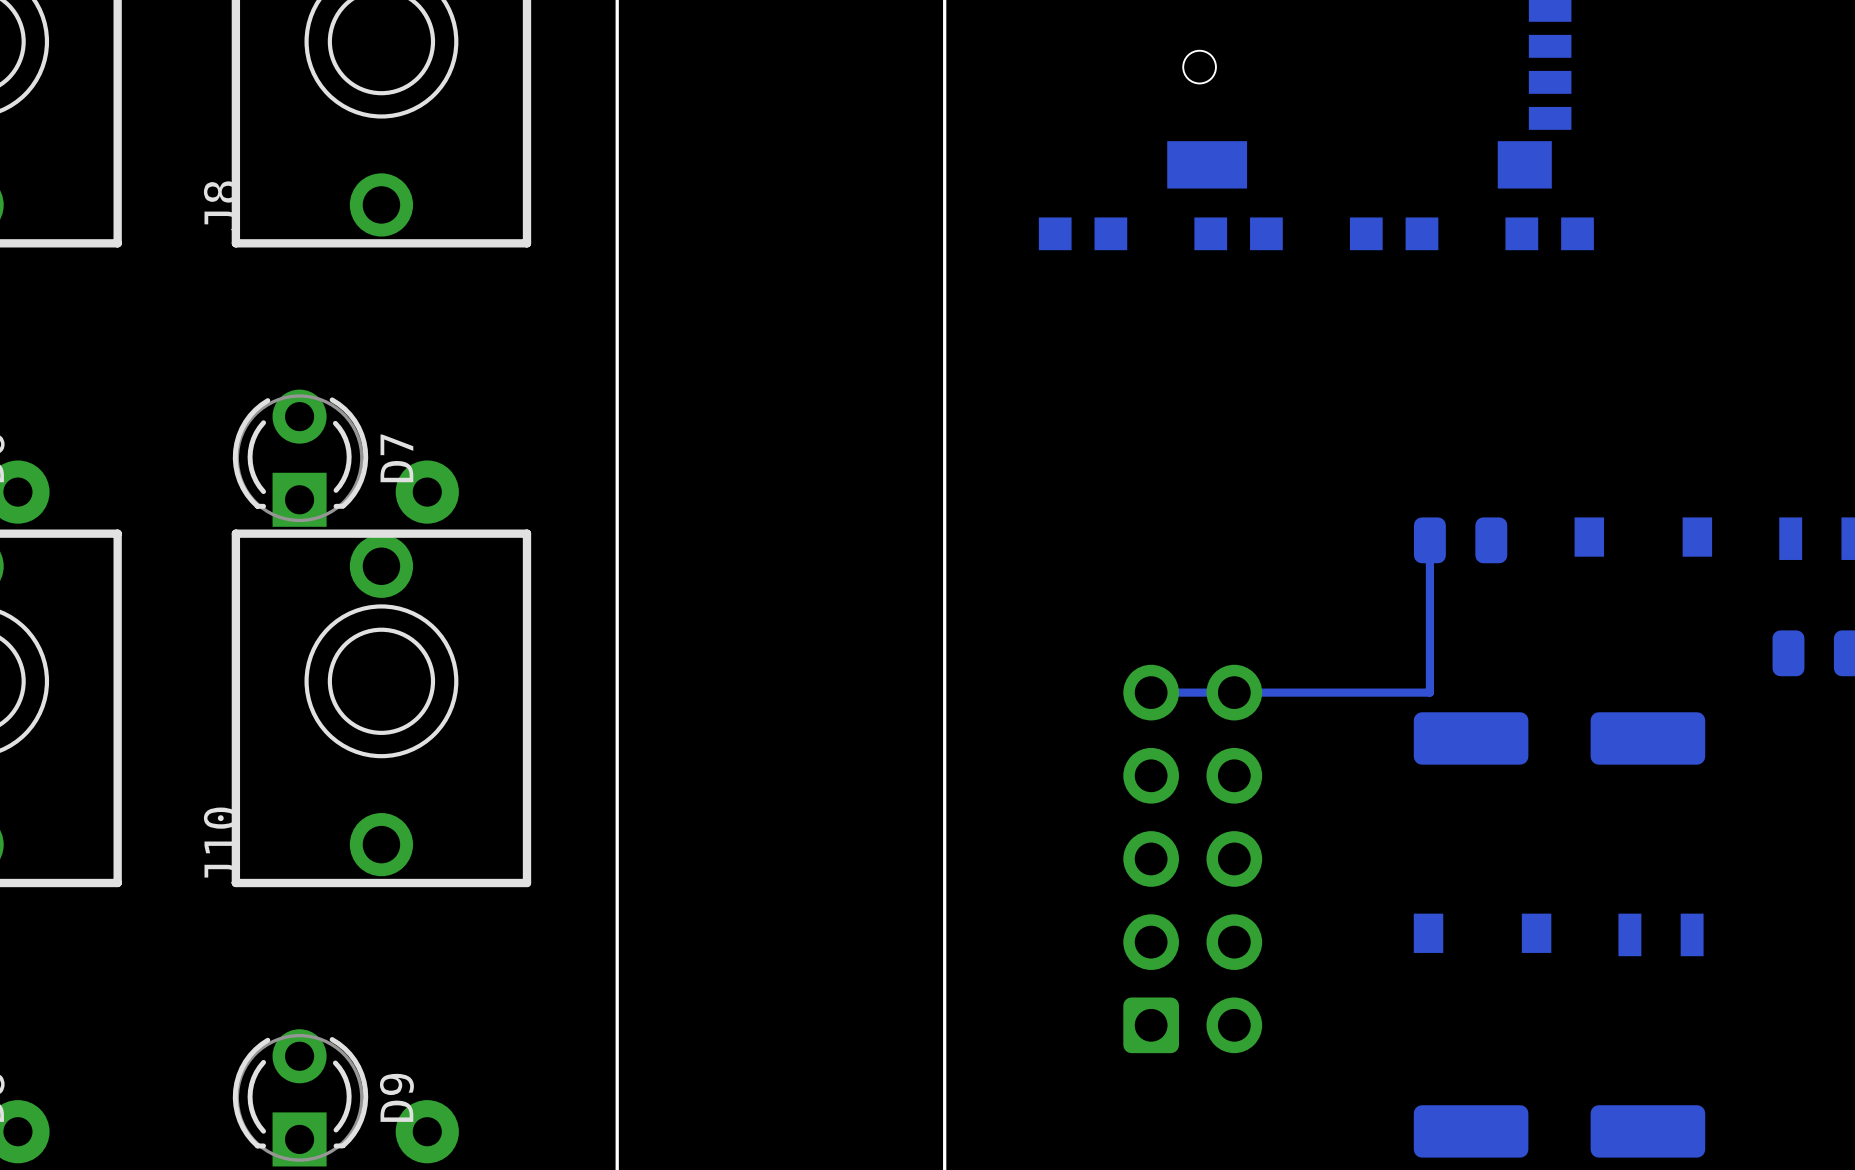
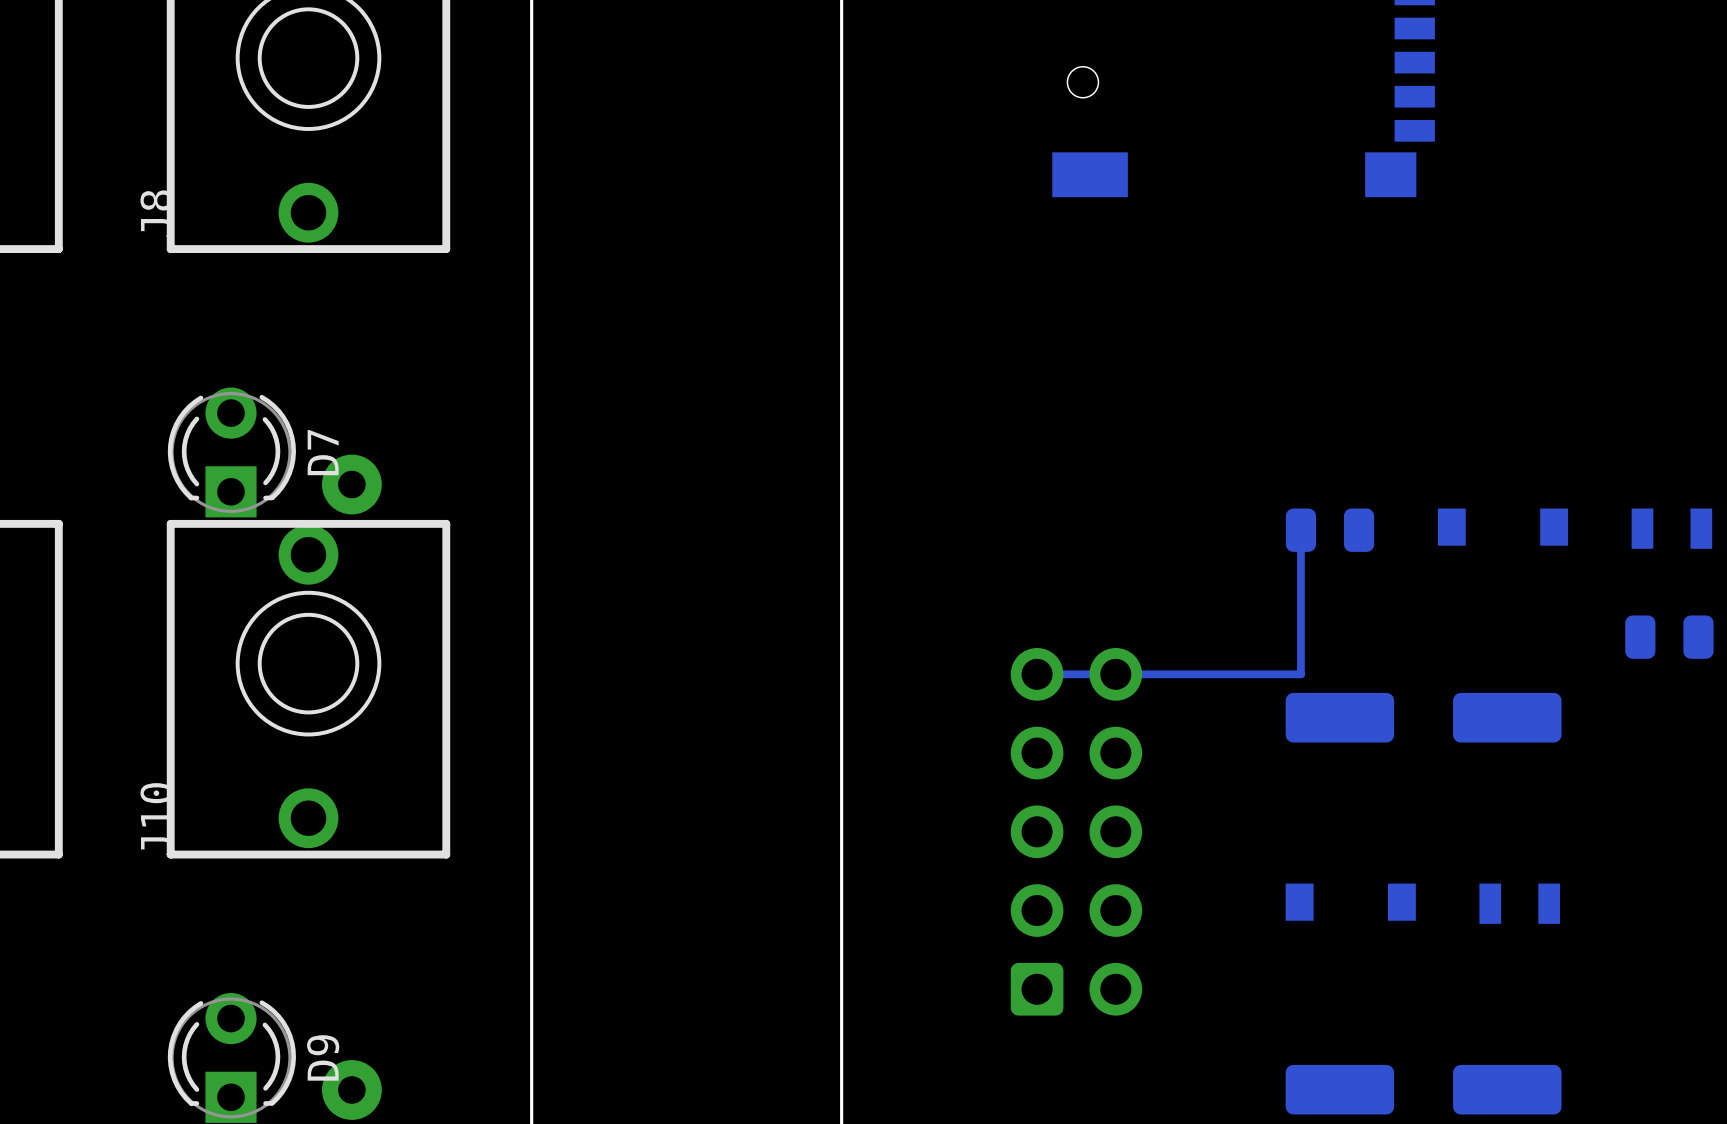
part: (1083, 233) -> none
part: (1238, 233) -> none
part: (1394, 233) -> none
part: (1549, 233) -> none

